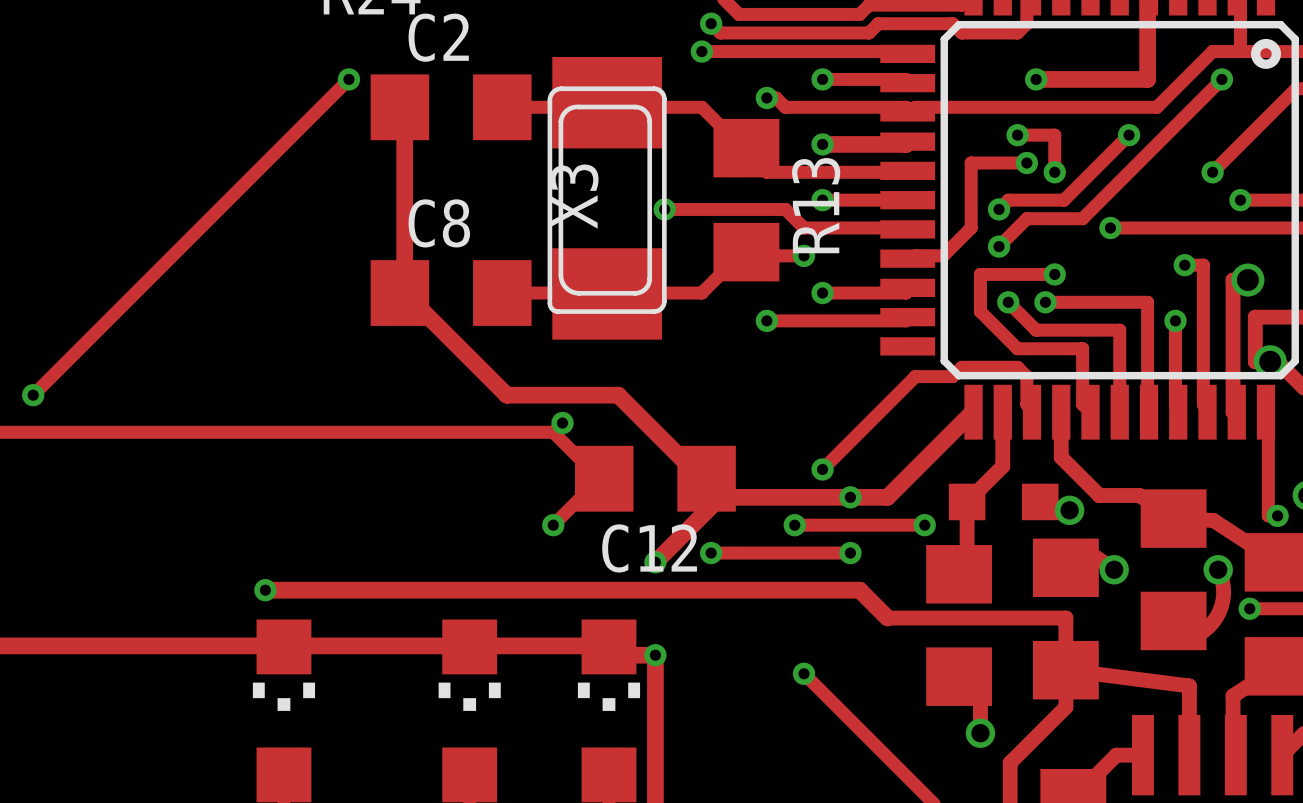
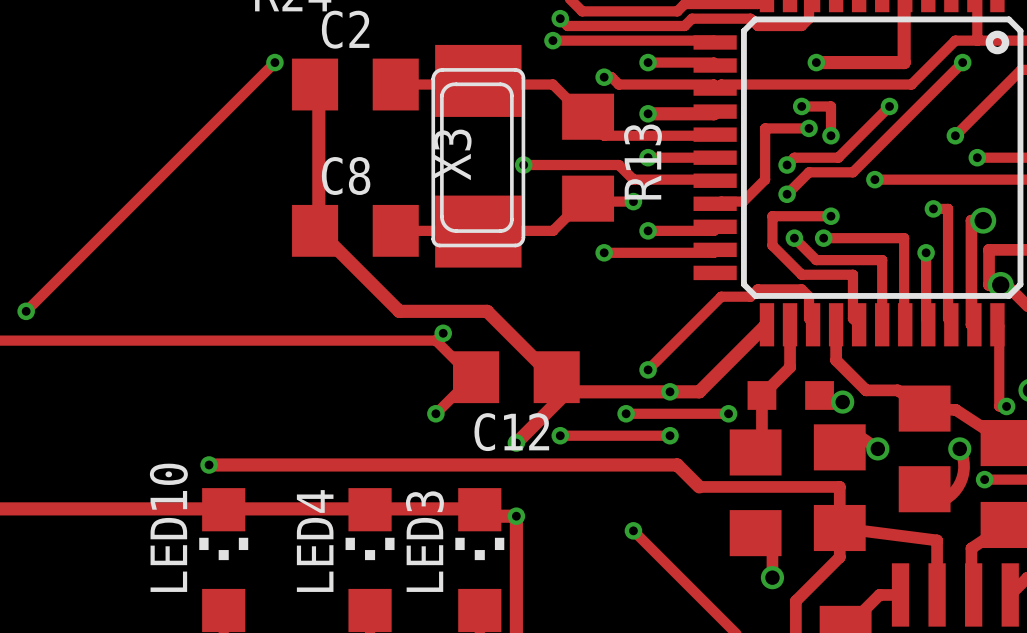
LED10 name: none -> LED10 (168, 527)
LED4 name: none -> LED4 (315, 541)
LED3 name: none -> LED3 (424, 541)

